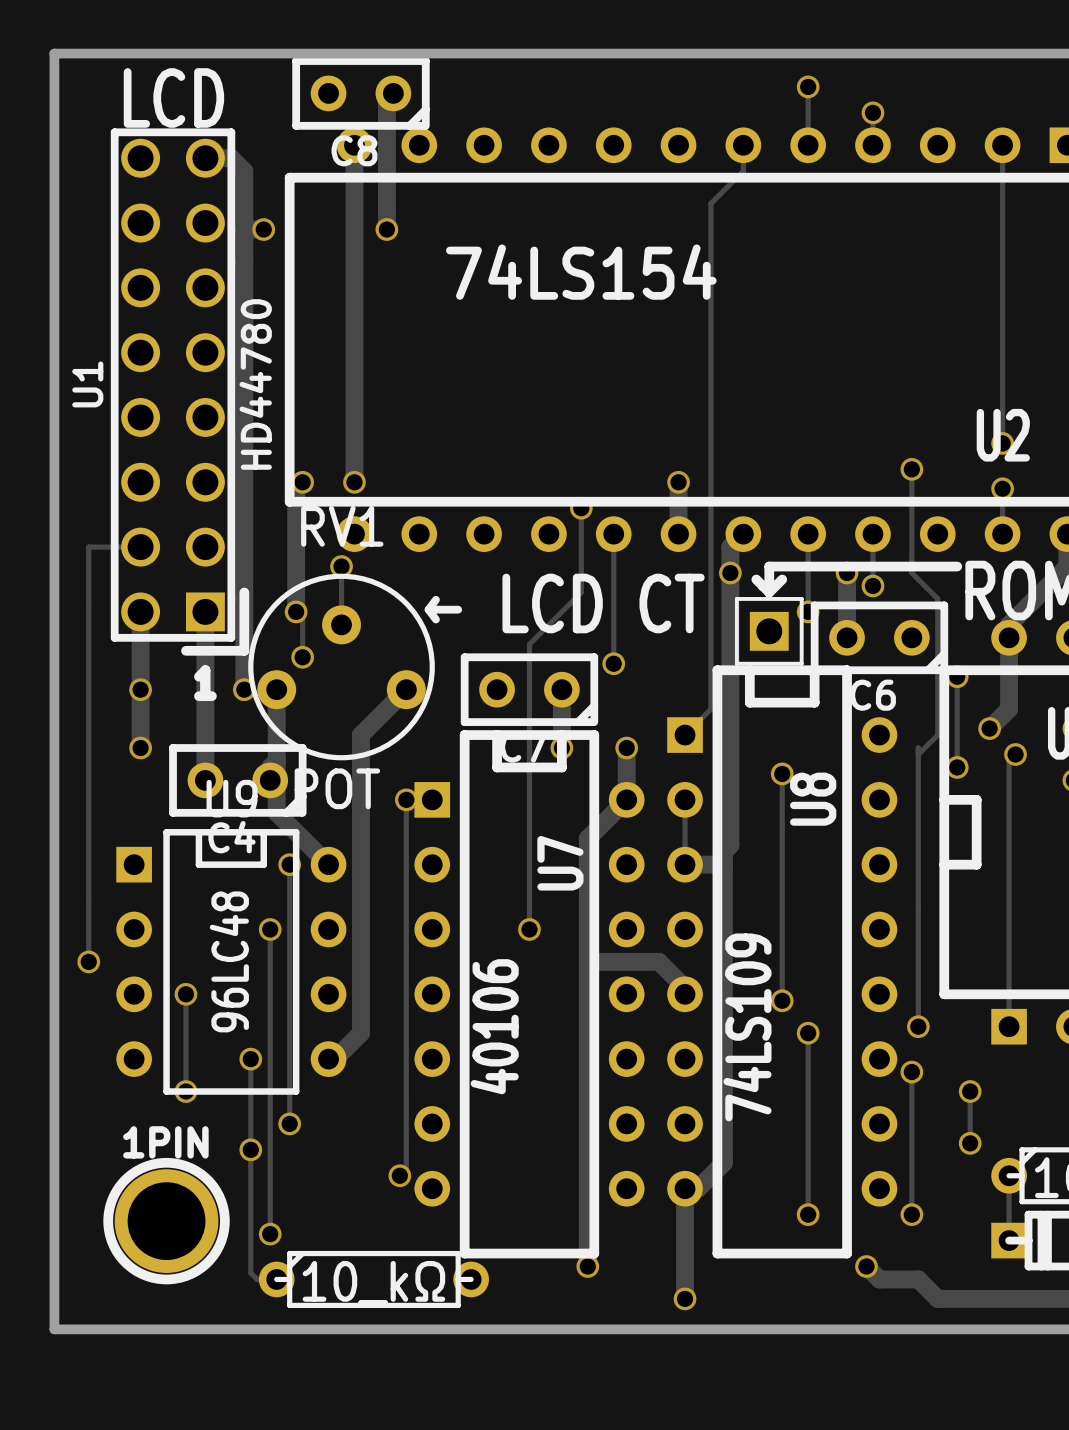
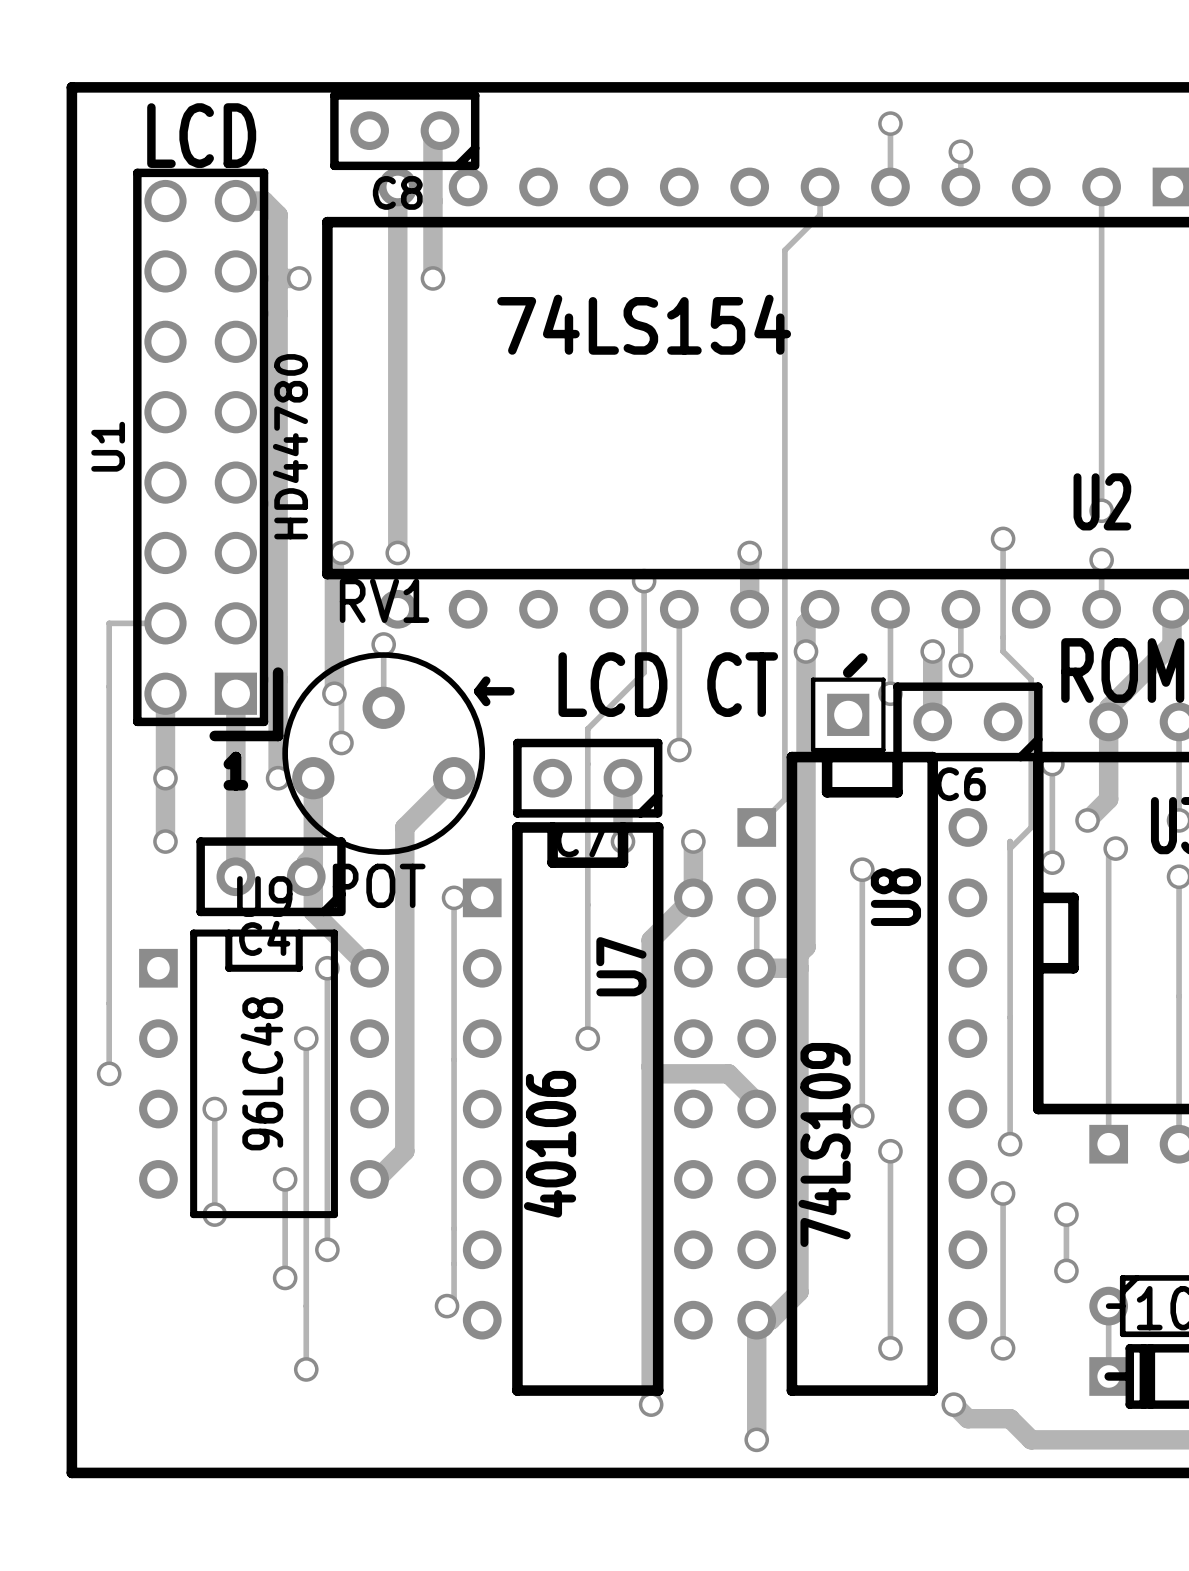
line: (957, 566) (769, 566) (769, 592) (756, 579) -> none
track: (250, 1149) (250, 1272) (257, 1279) (276, 1279) -> none
1PIN: (166, 1221) -> none
part: 10_kΩ (373, 1279) -> none

